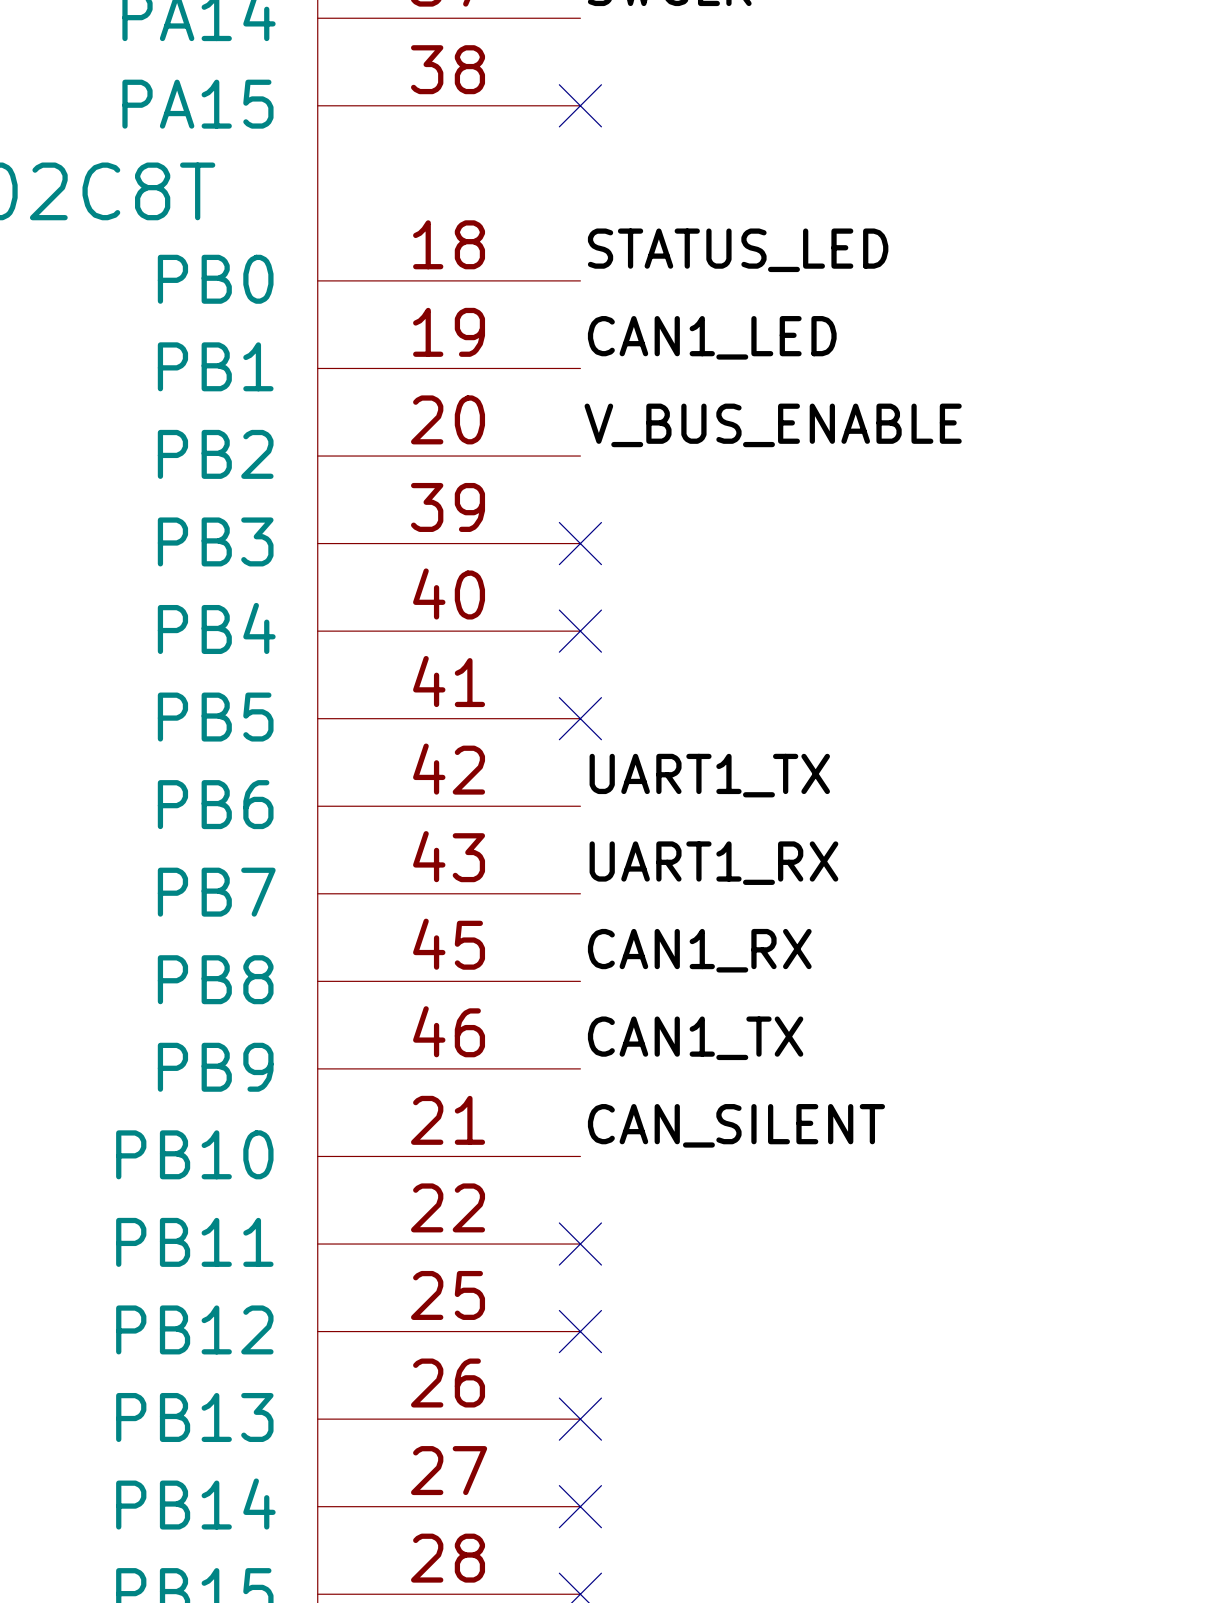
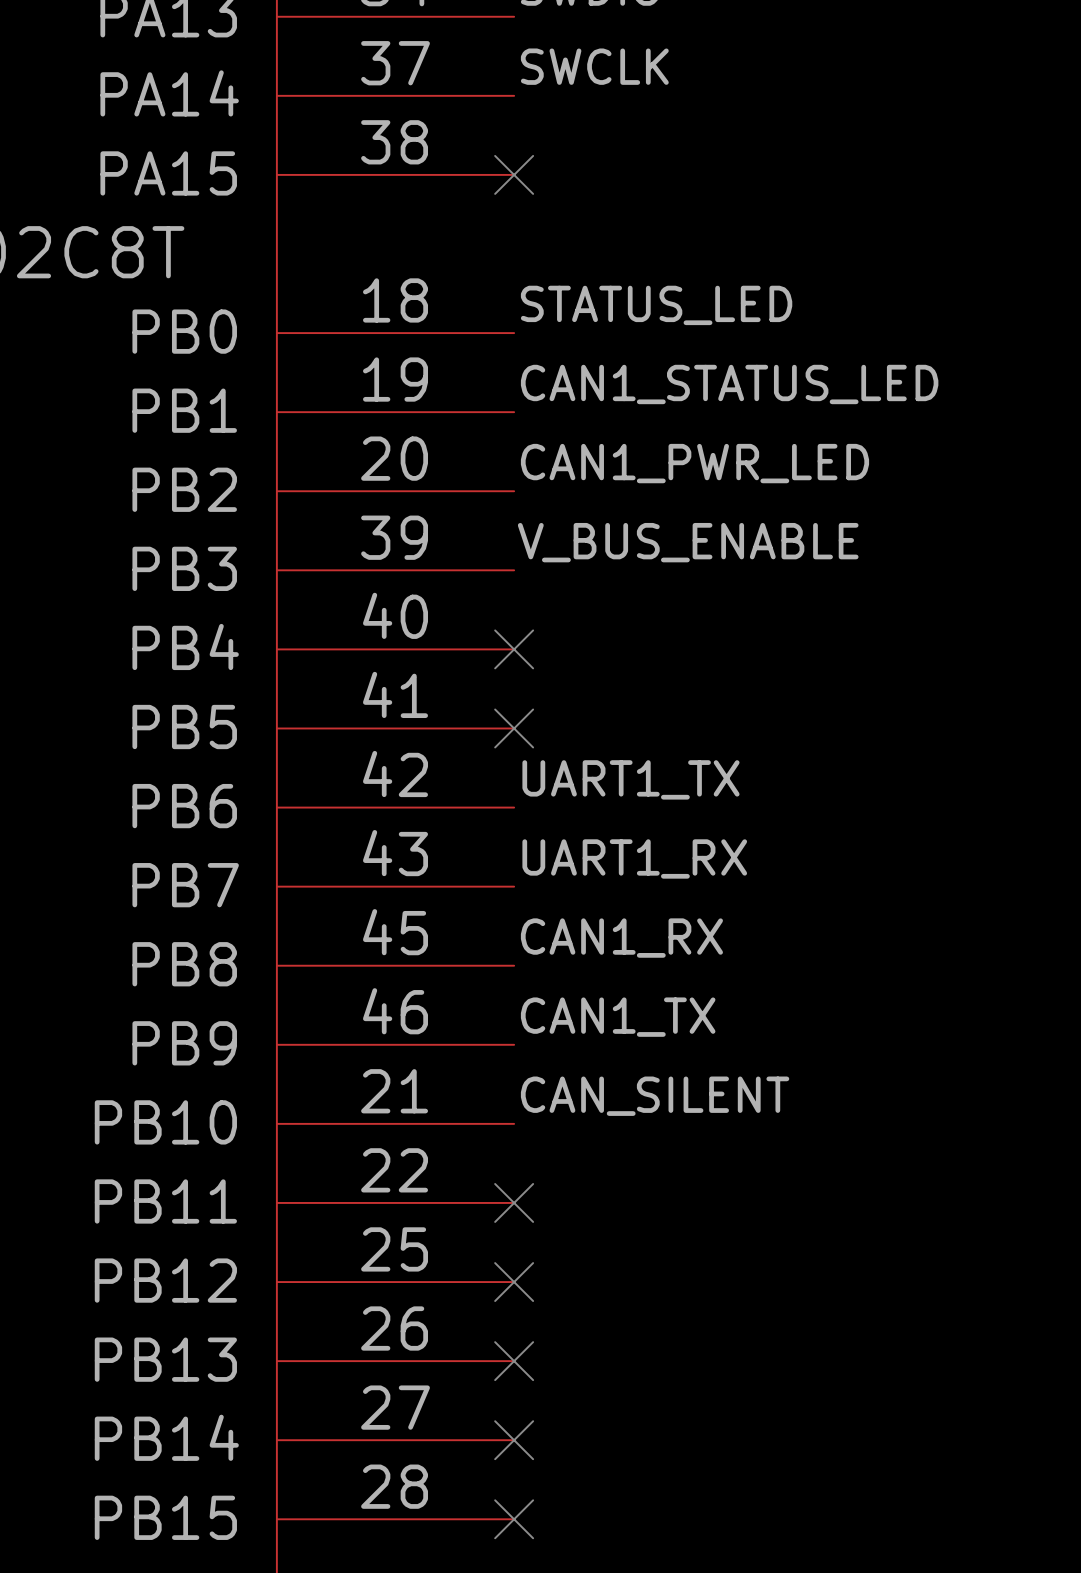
label: CAN1_LED (712, 337) -> CAN1_STATUS_LED (729, 384)
label: V_BUS_ENABLE (773, 425) -> CAN1_PWR_LED (694, 463)
label: none -> V_BUS_ENABLE (688, 542)
no-connect mark: (580, 543) -> none

